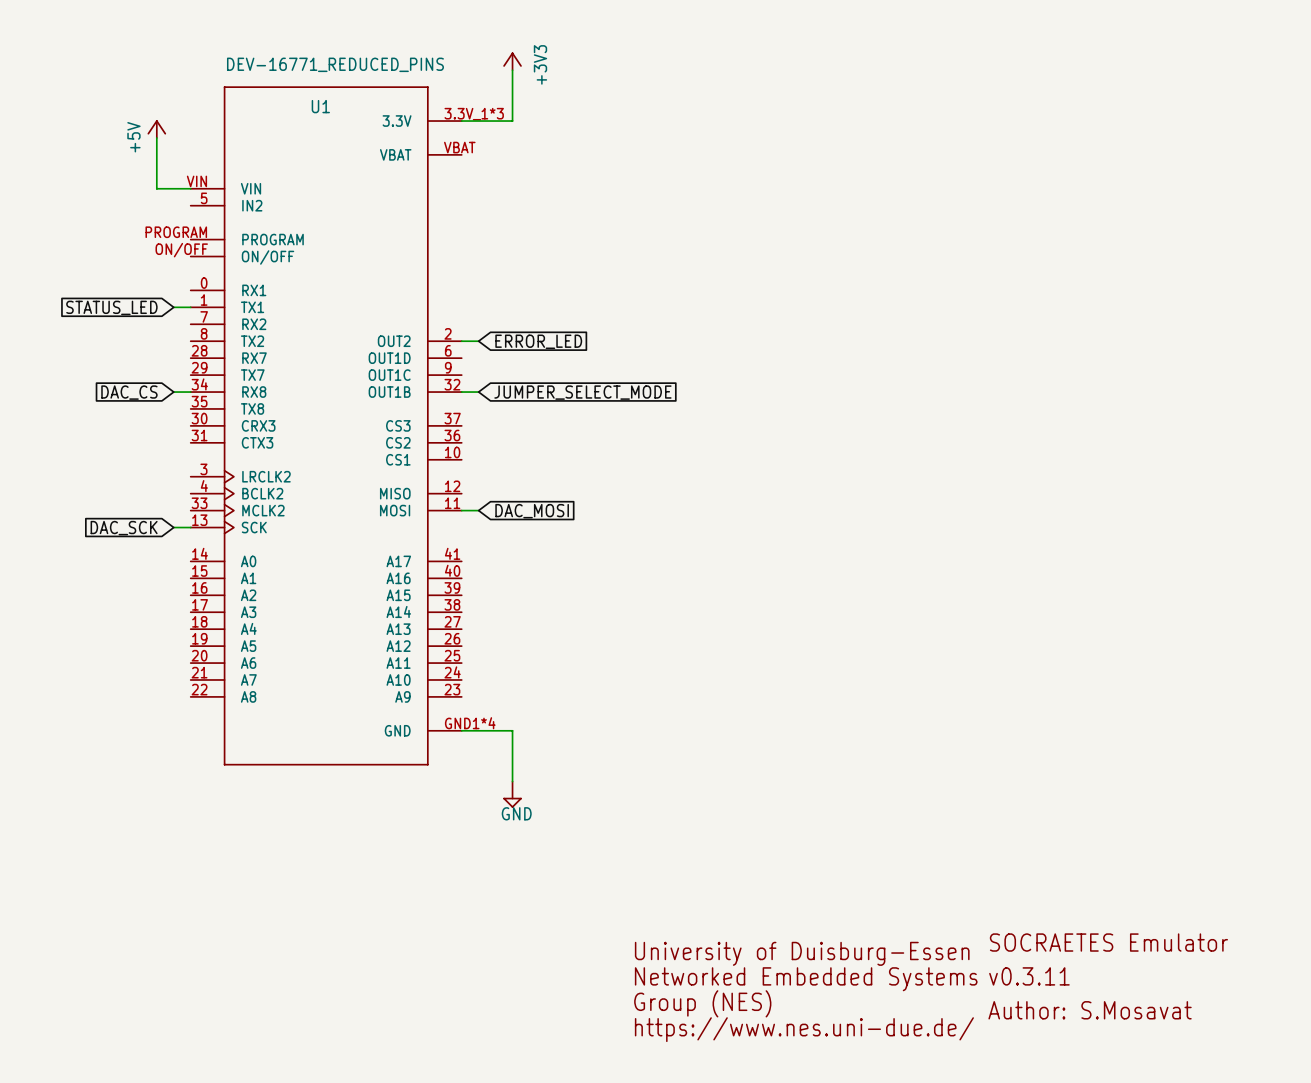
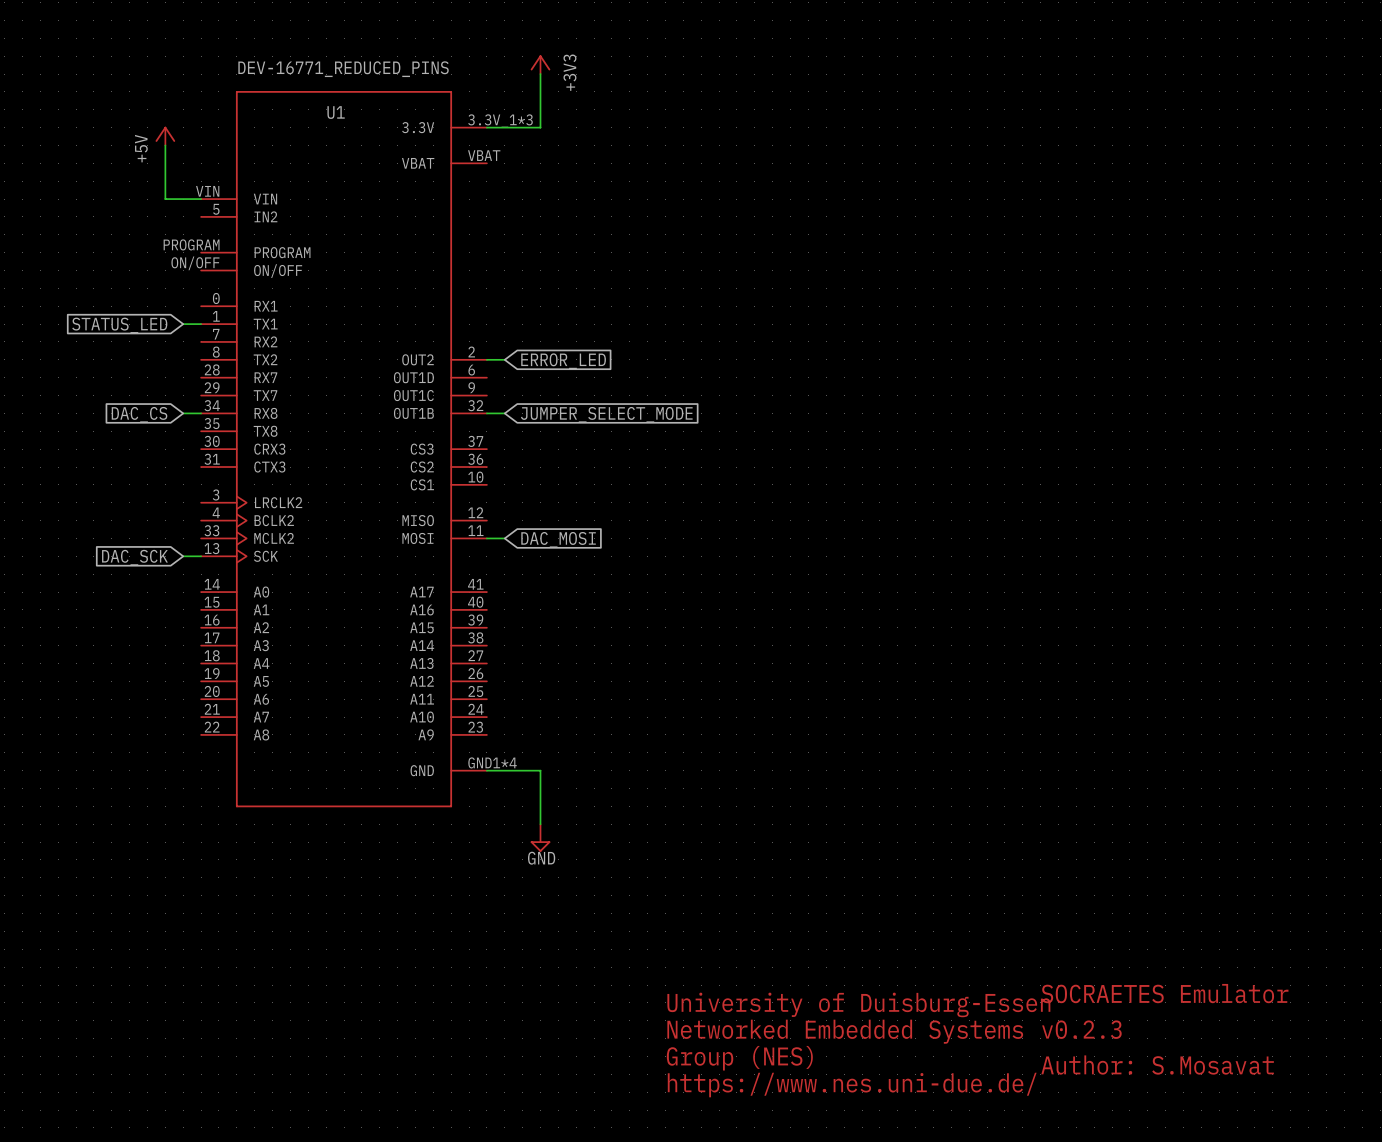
text: v0.3.11 (1029, 976) -> v0.2.3 (1081, 1029)

